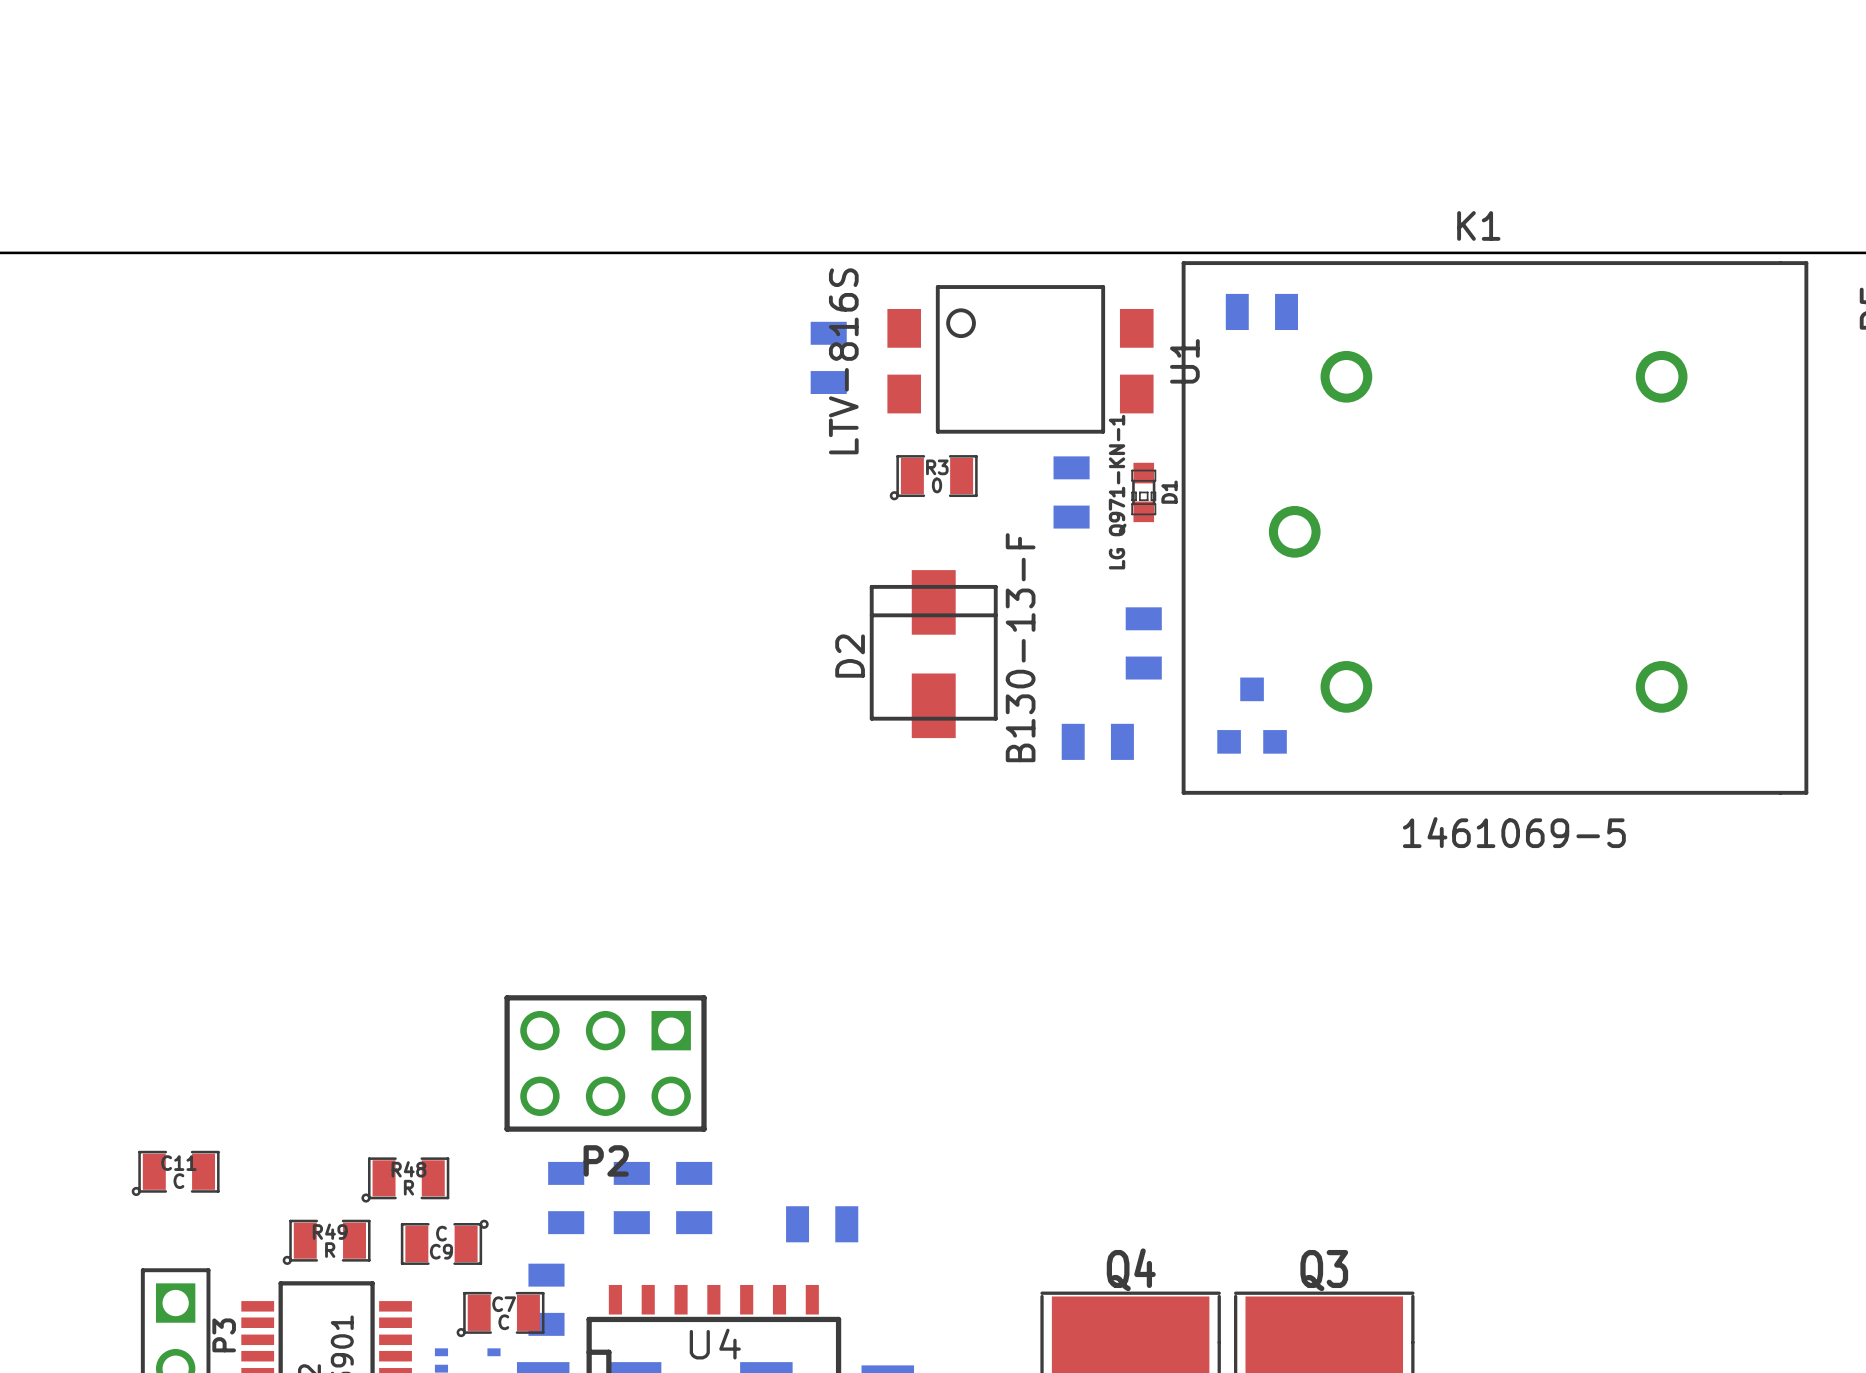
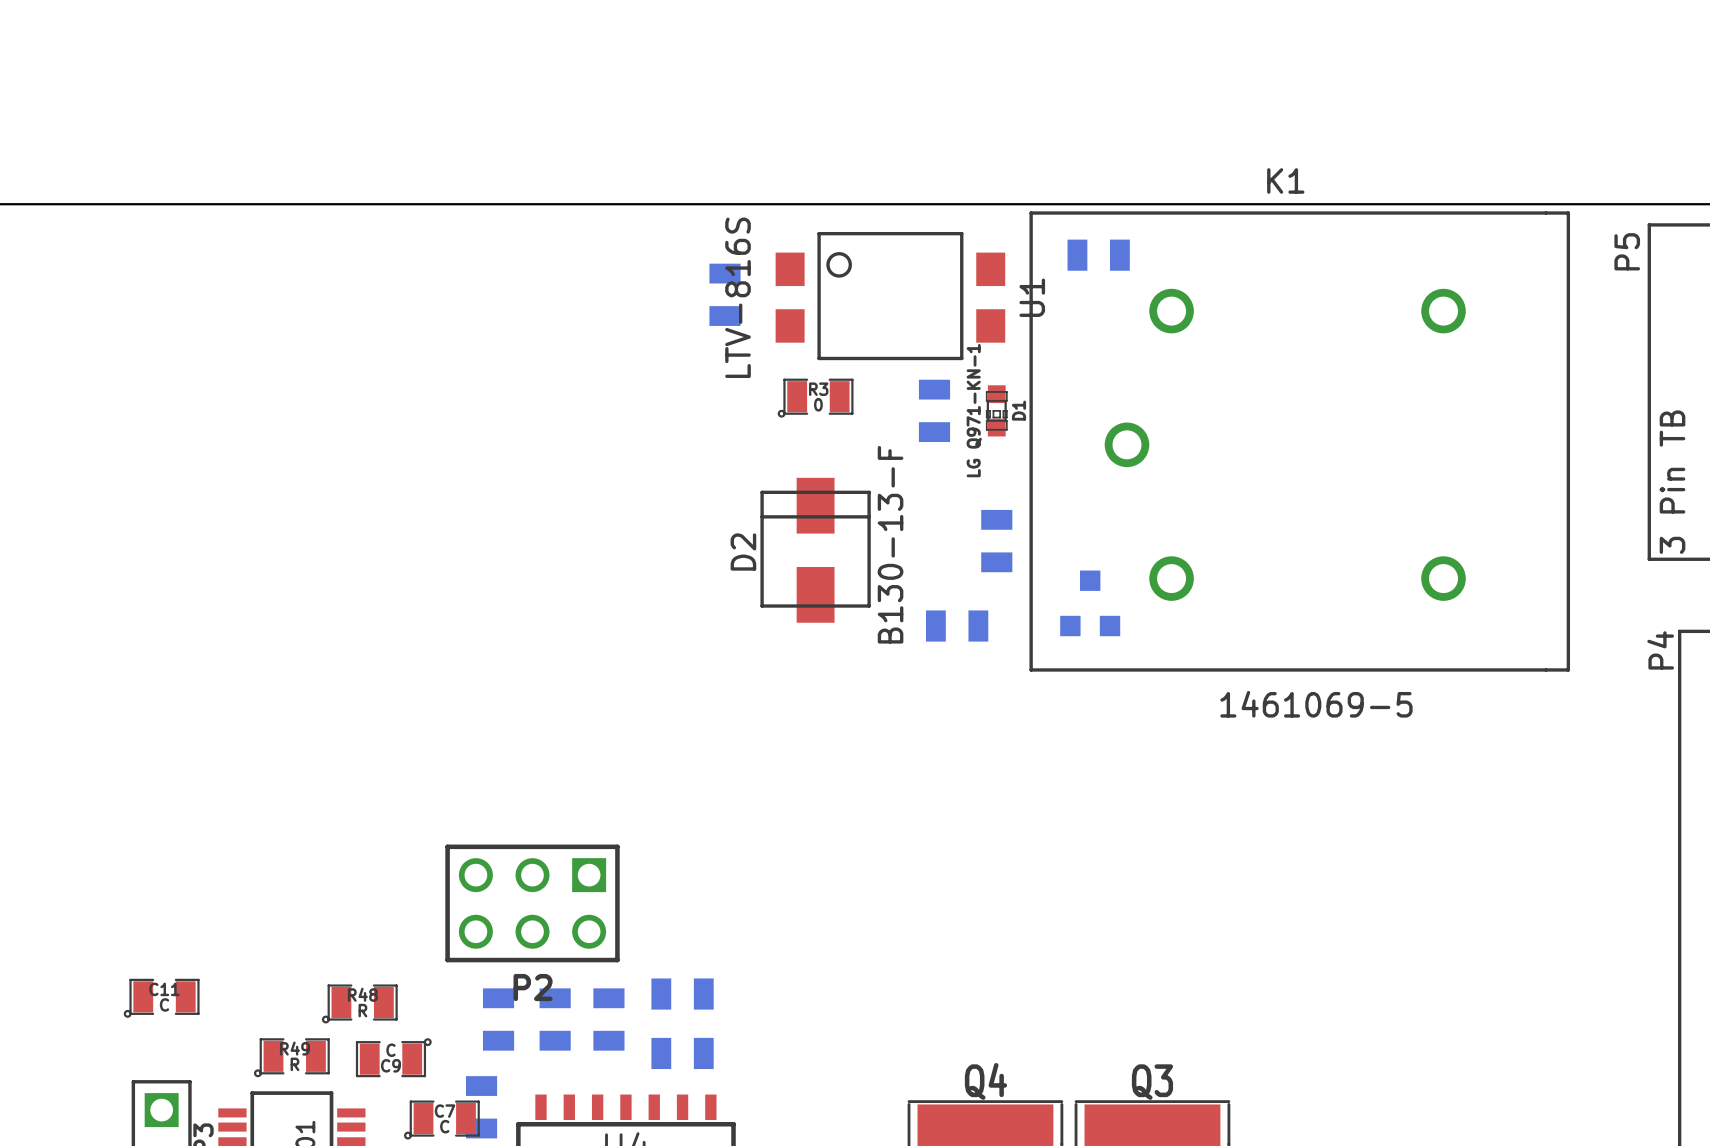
part: none -> (682, 994)
part: (822, 1224) -> none
part: none -> (682, 1053)

